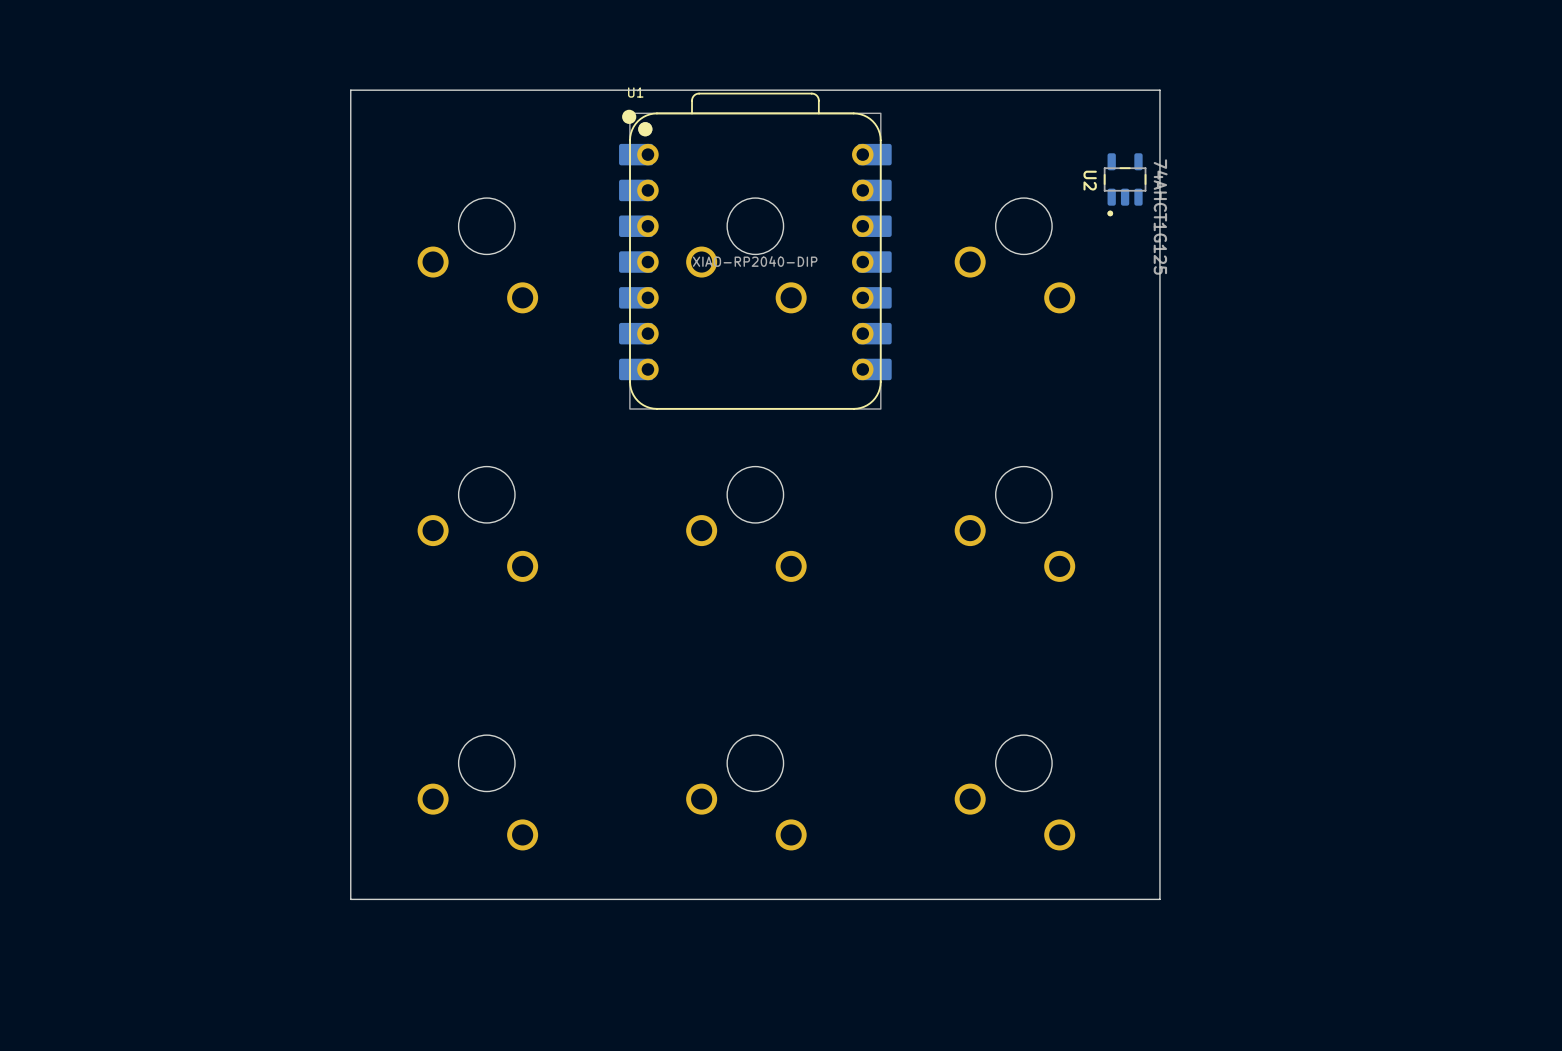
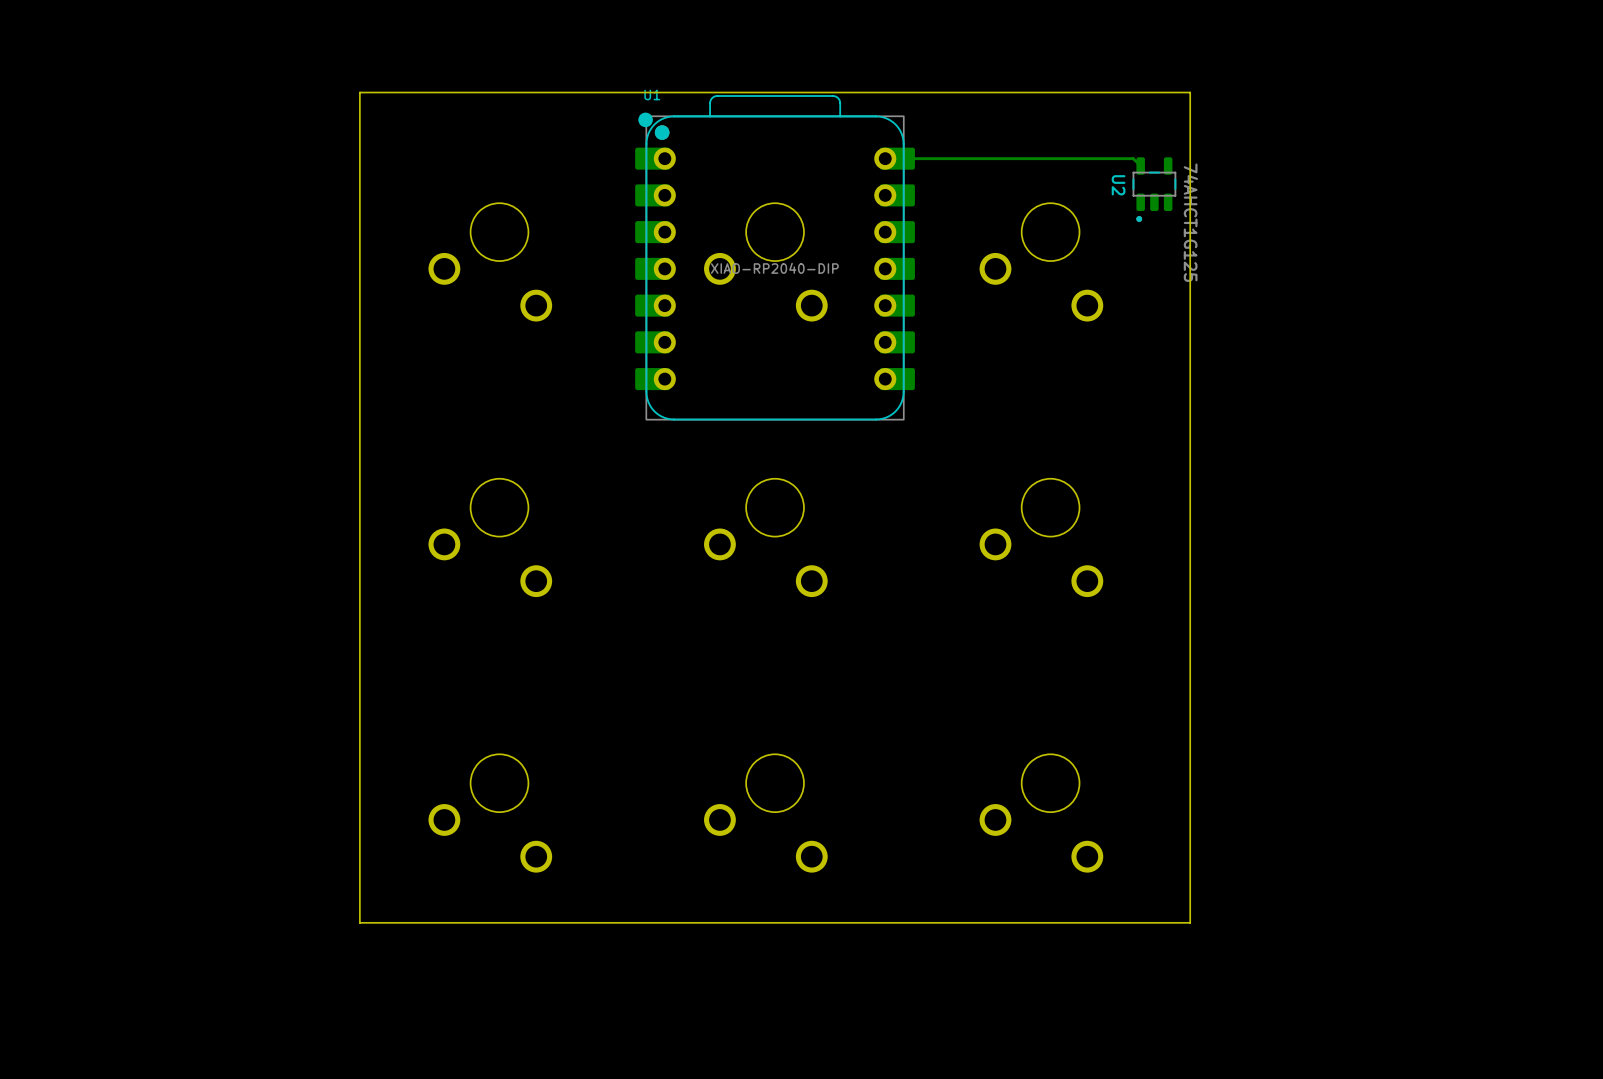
track: none -> (885, 158) (1133, 158) (1140, 166)

